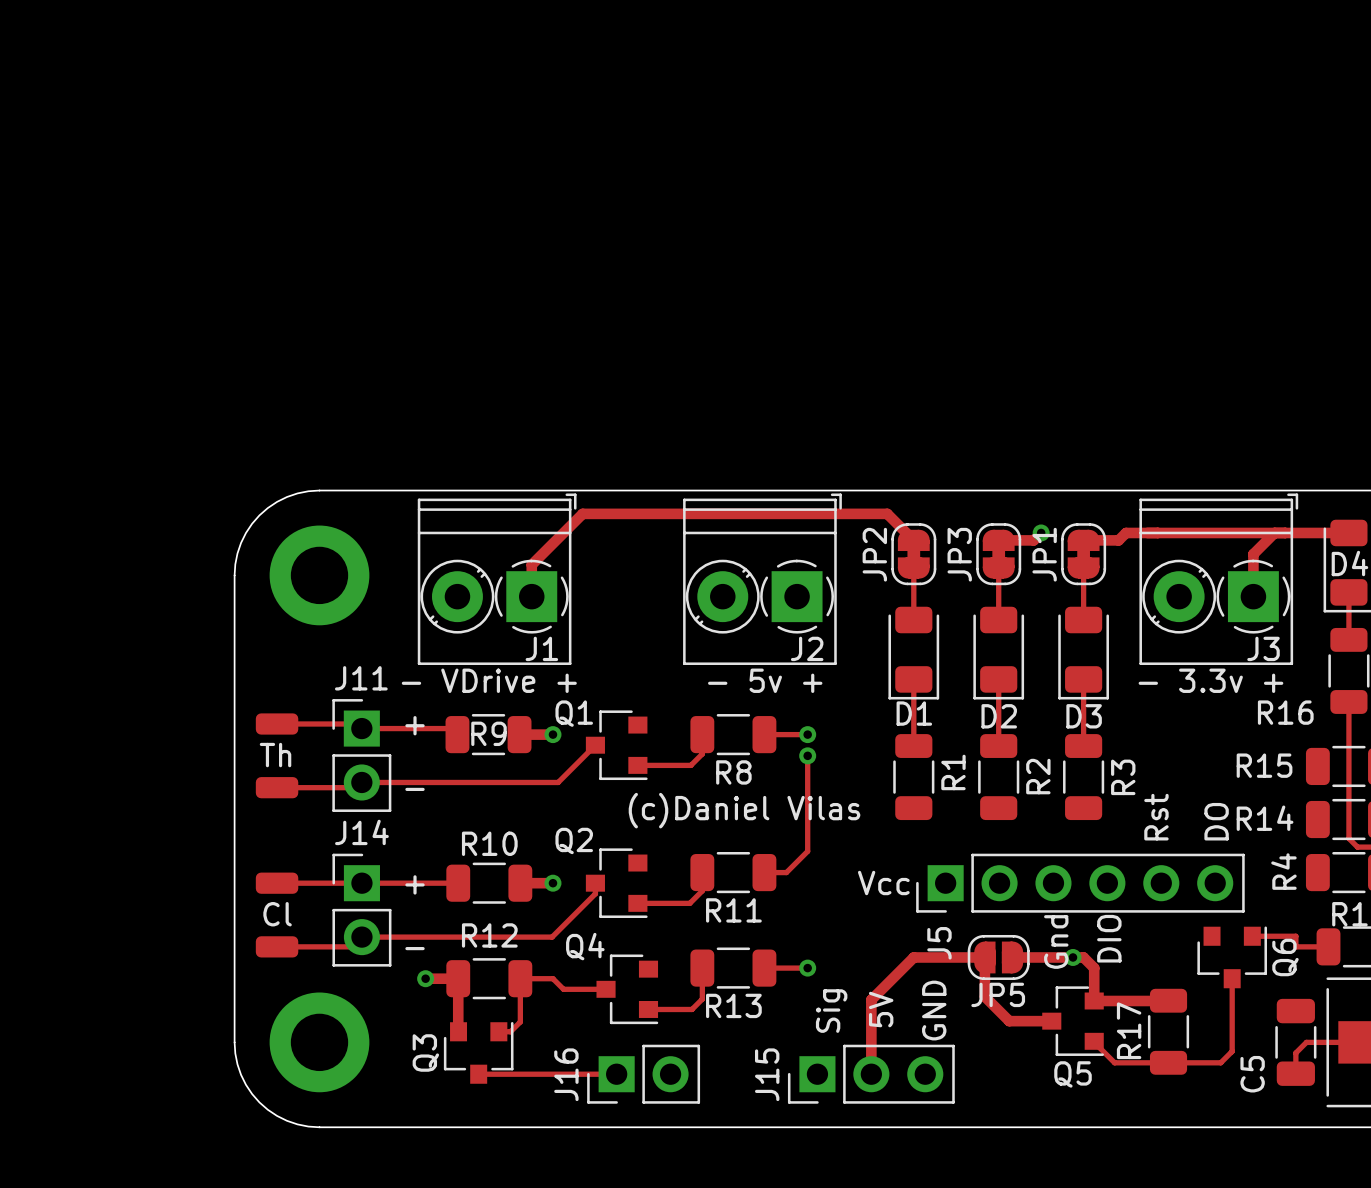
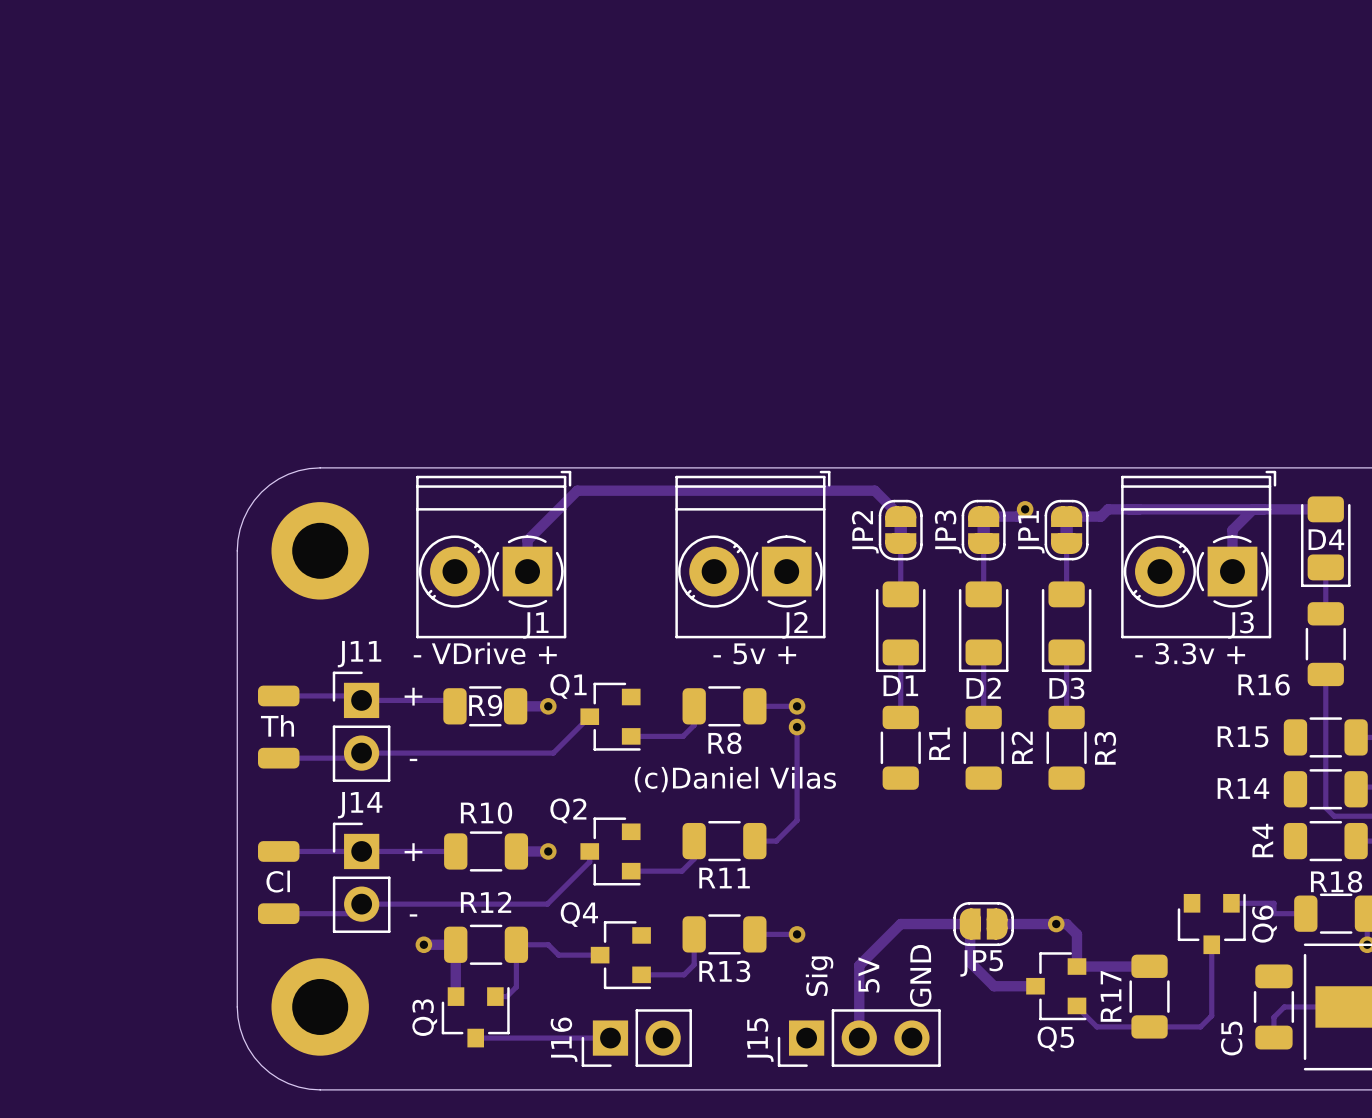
text: Rst (1156, 817) -> none
text: DO (1216, 821) -> none
text: Vcc (883, 883) -> none
J5: (1080, 883) -> none
text: DIO (1109, 938) -> none
text: Gnd (1056, 941) -> none

